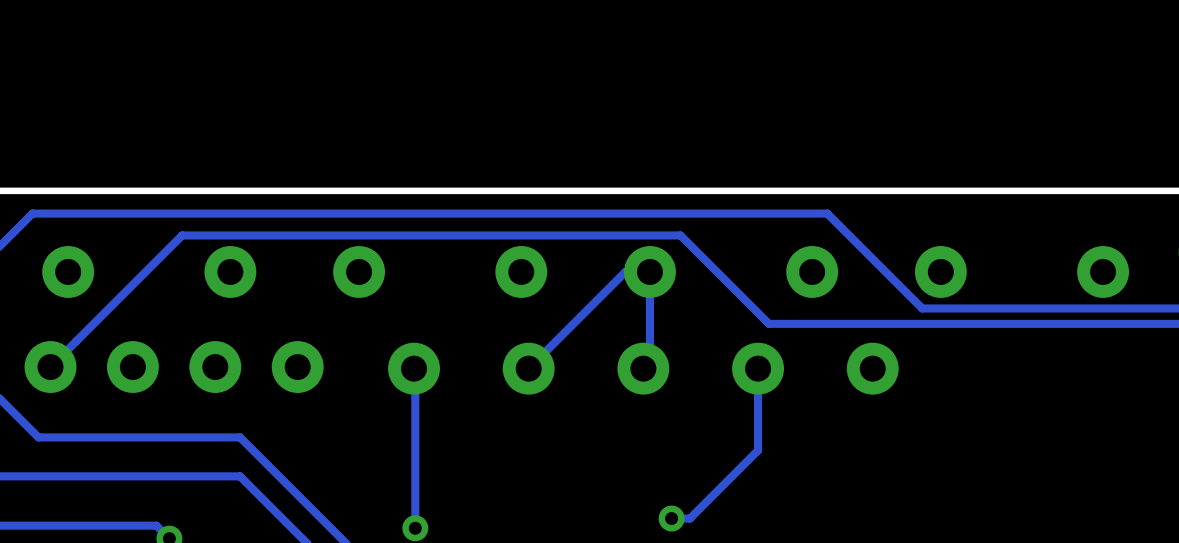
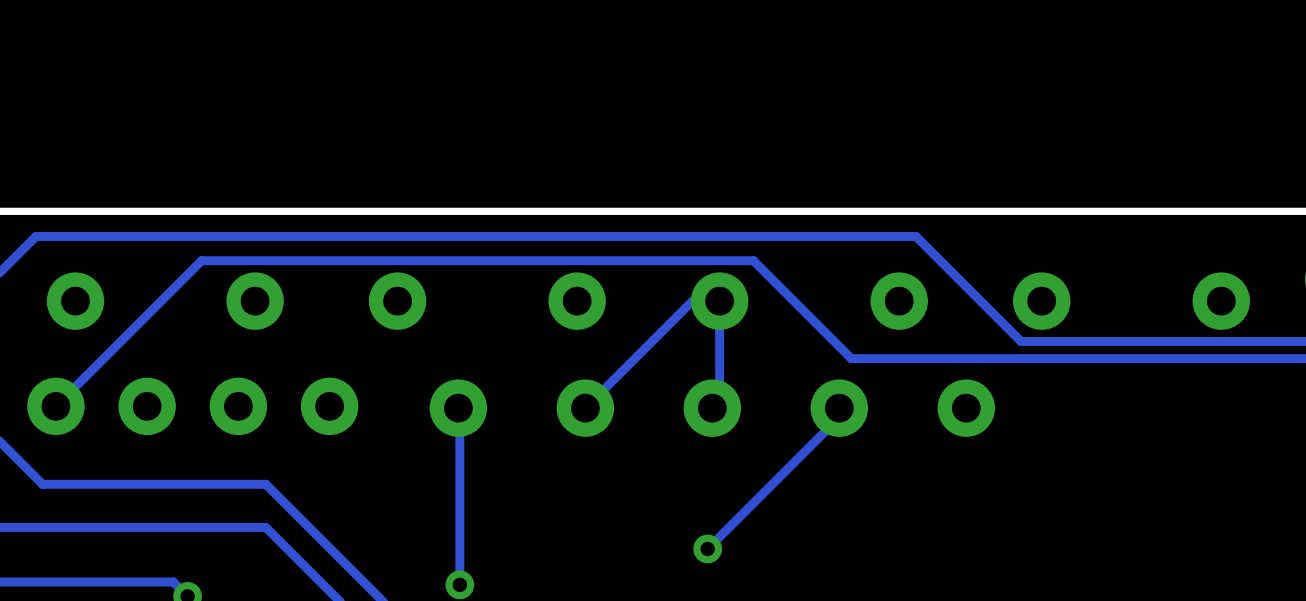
track: (758, 376) (758, 450) (689, 518) (671, 518) -> (839, 417) (707, 548)
via position: (671, 518) -> (707, 548)

